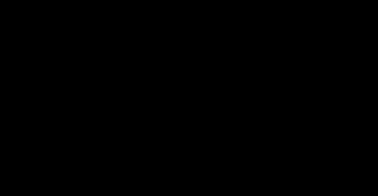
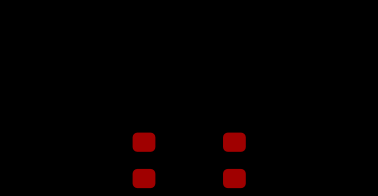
part: none -> (143, 160)
part: none -> (234, 160)

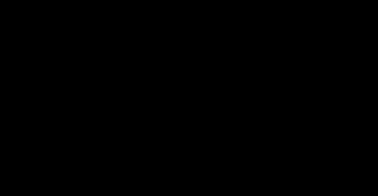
part: (143, 160) -> none
part: (234, 160) -> none

